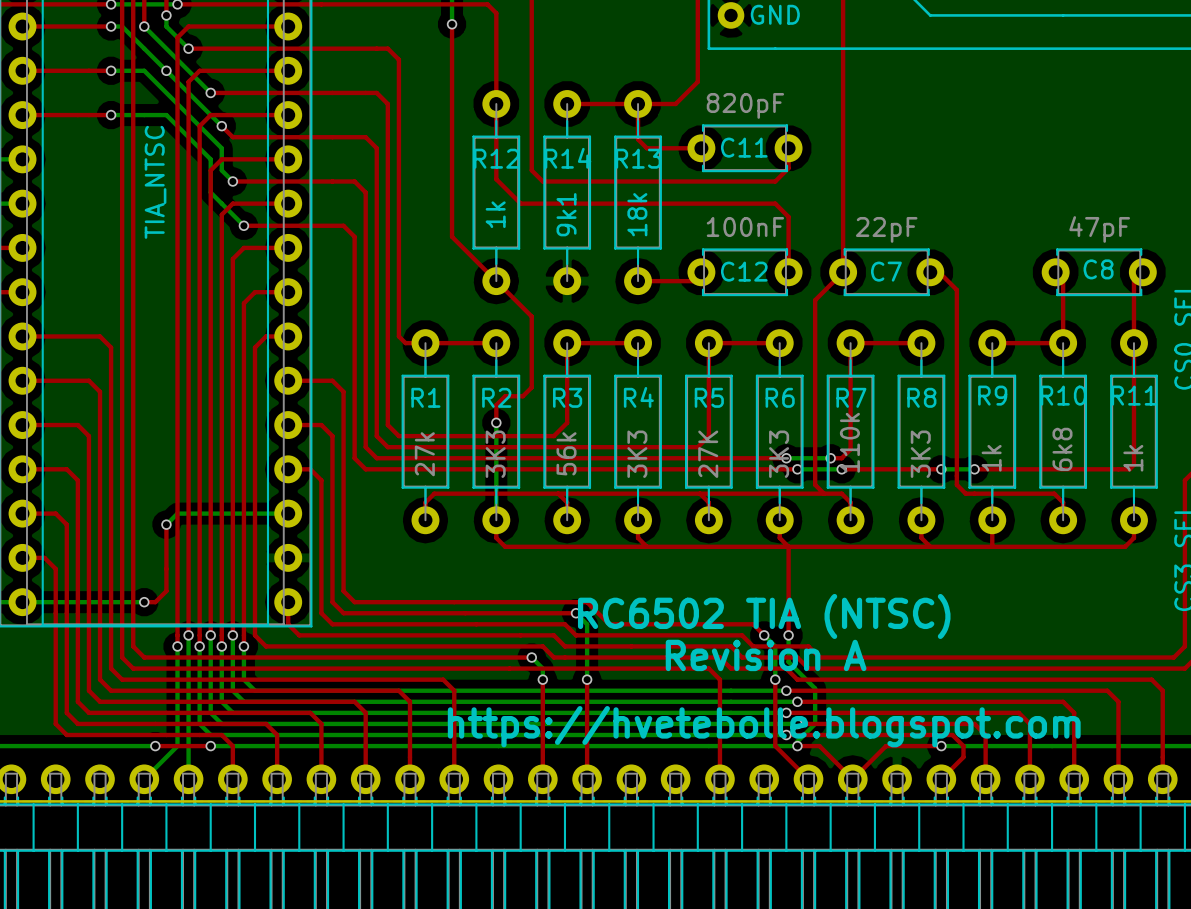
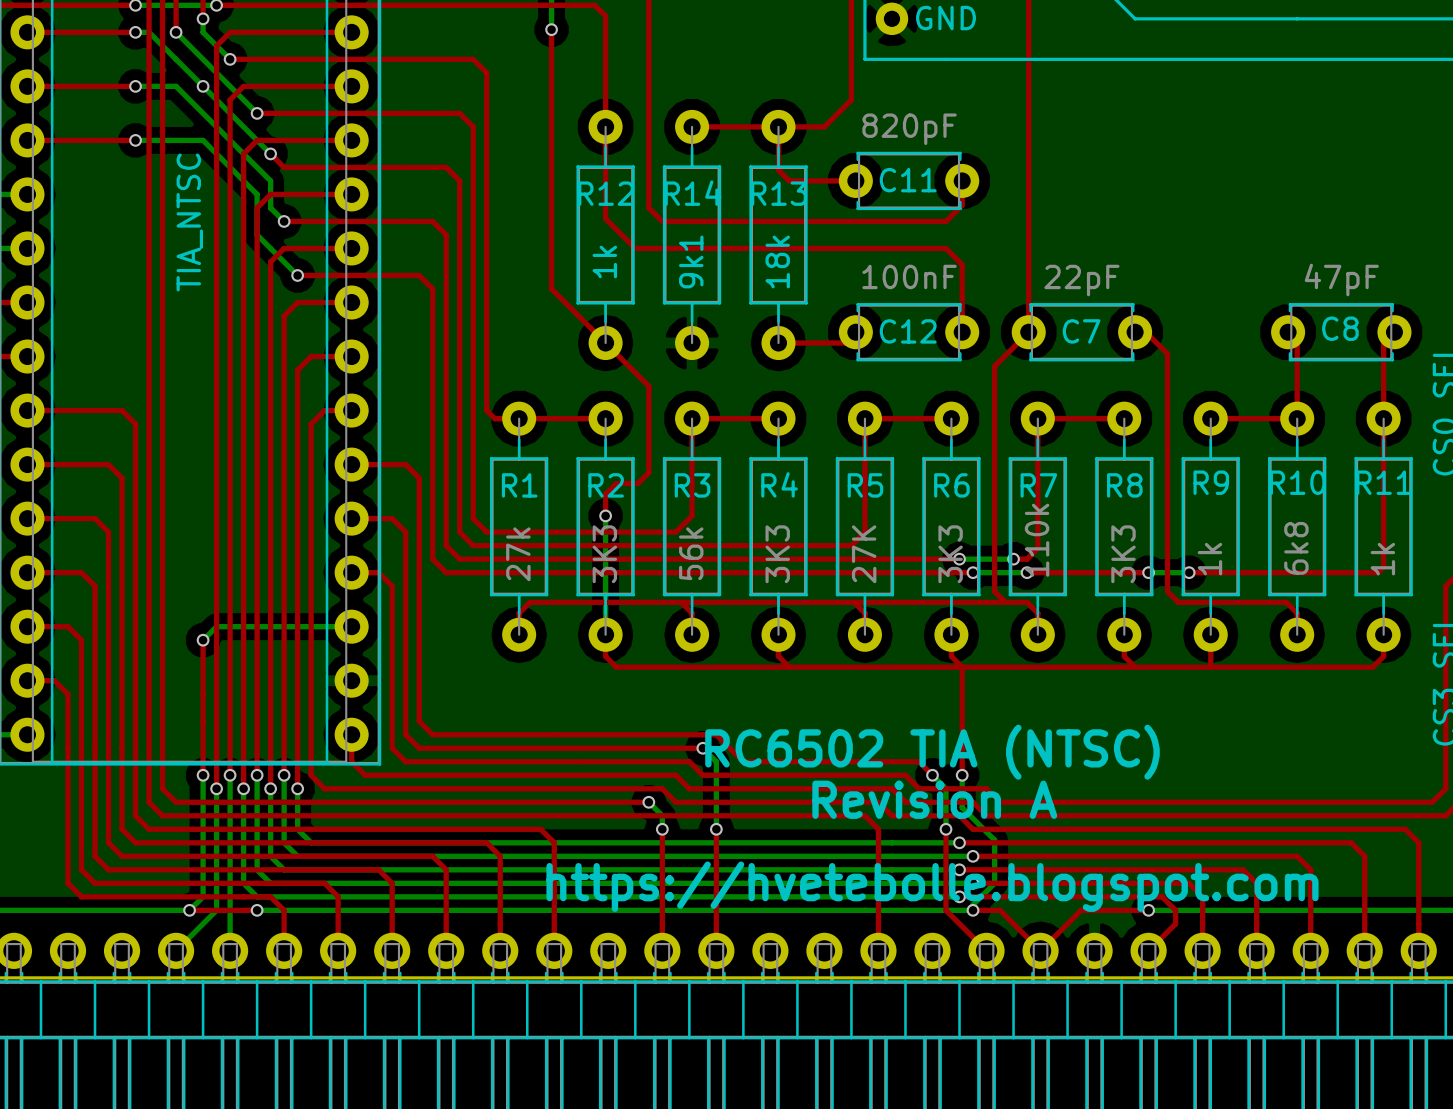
top track: (166, 591) (155, 602) (144, 602) -> (203, 721) (203, 775)
bottom track: (22, 602) (144, 602) -> none
via position: (144, 602) -> (203, 775)
bottom track: none -> (203, 775) (203, 896) (189, 910)

